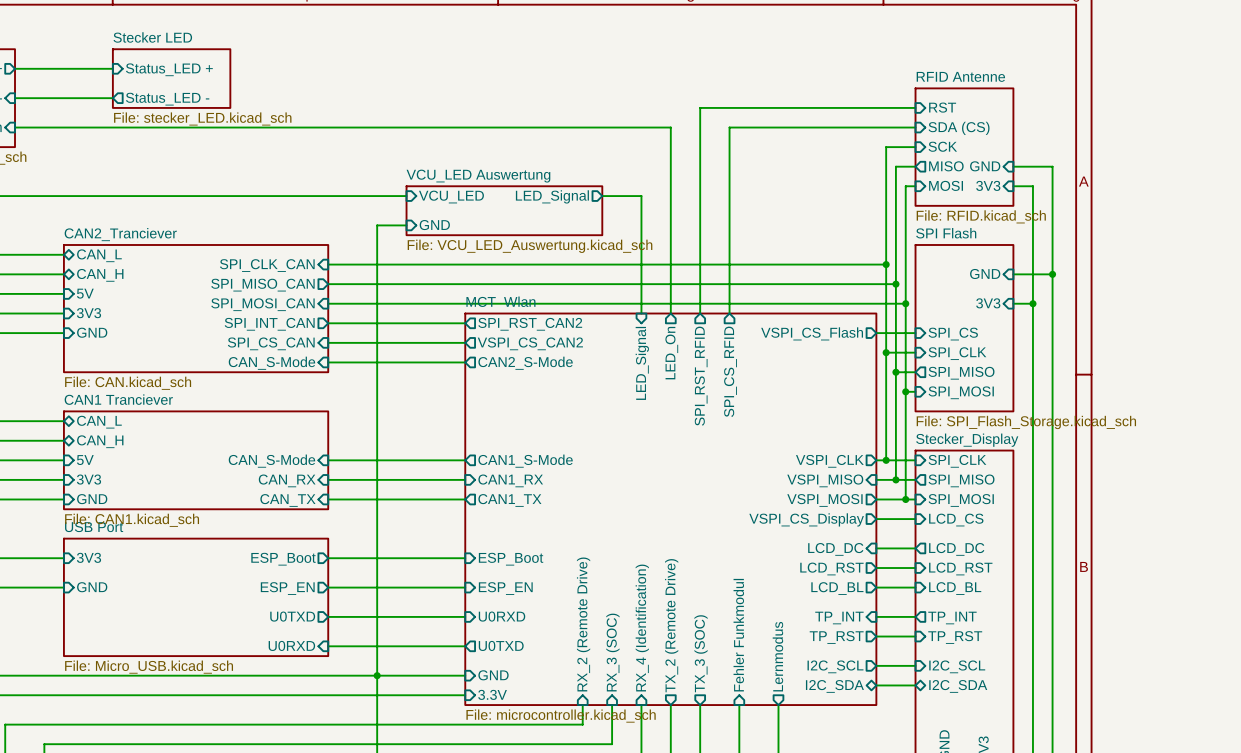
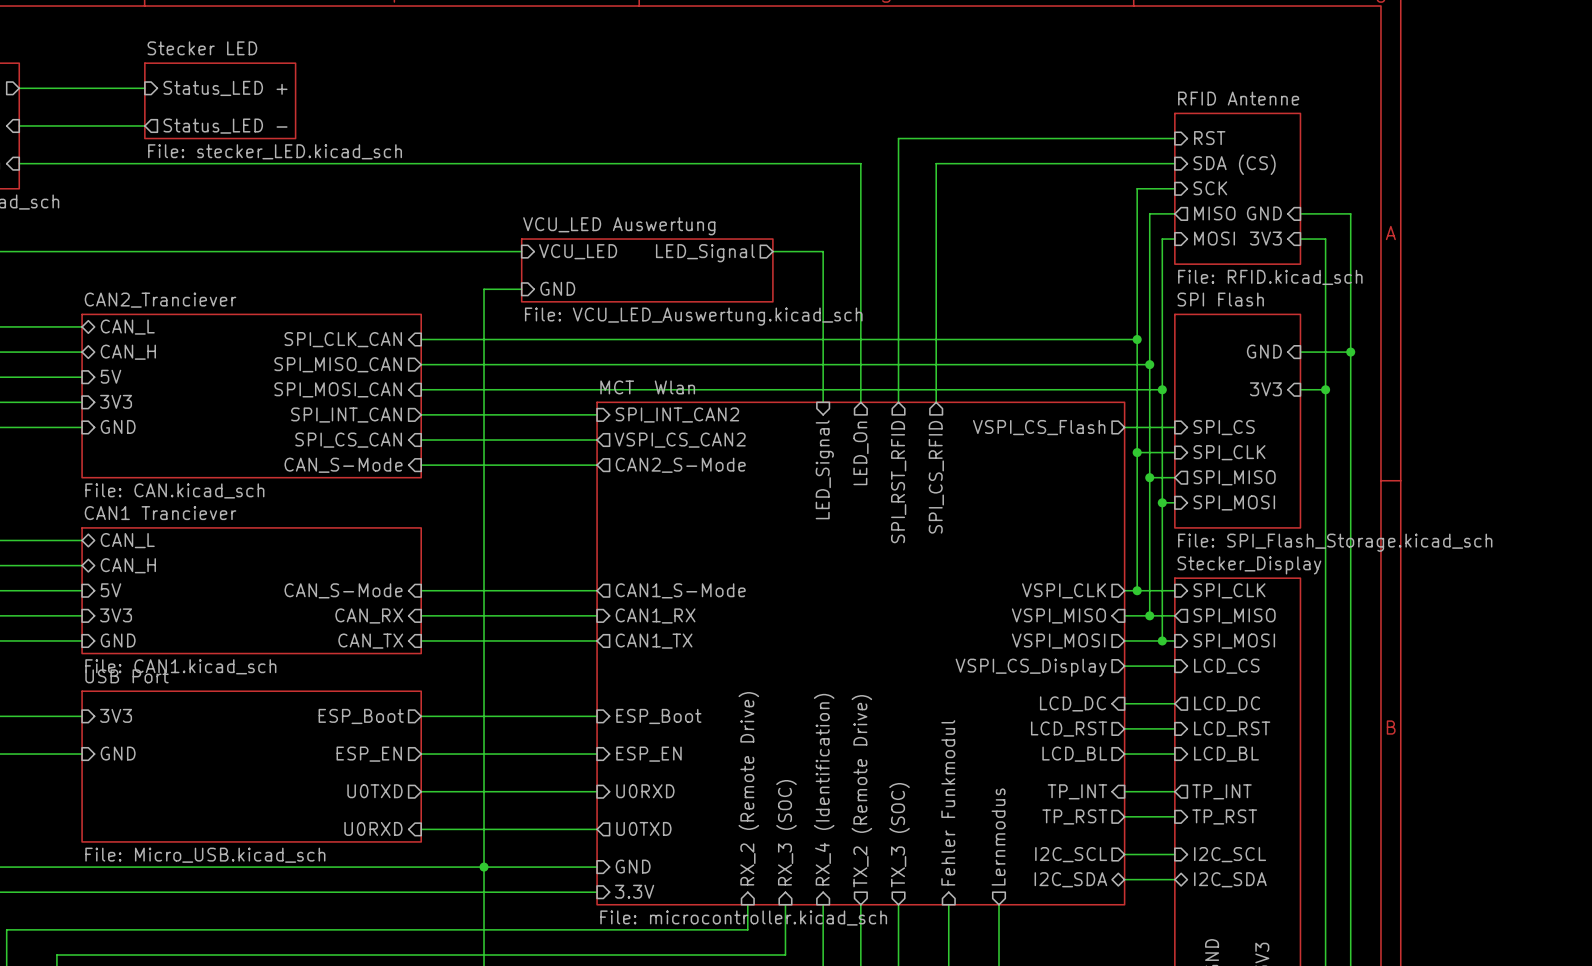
sheet pin shape: output (530, 324) -> input (677, 415)
sheet pin: SPI_RST_CAN2 (530, 324) -> SPI_INT_CAN2 (677, 415)

